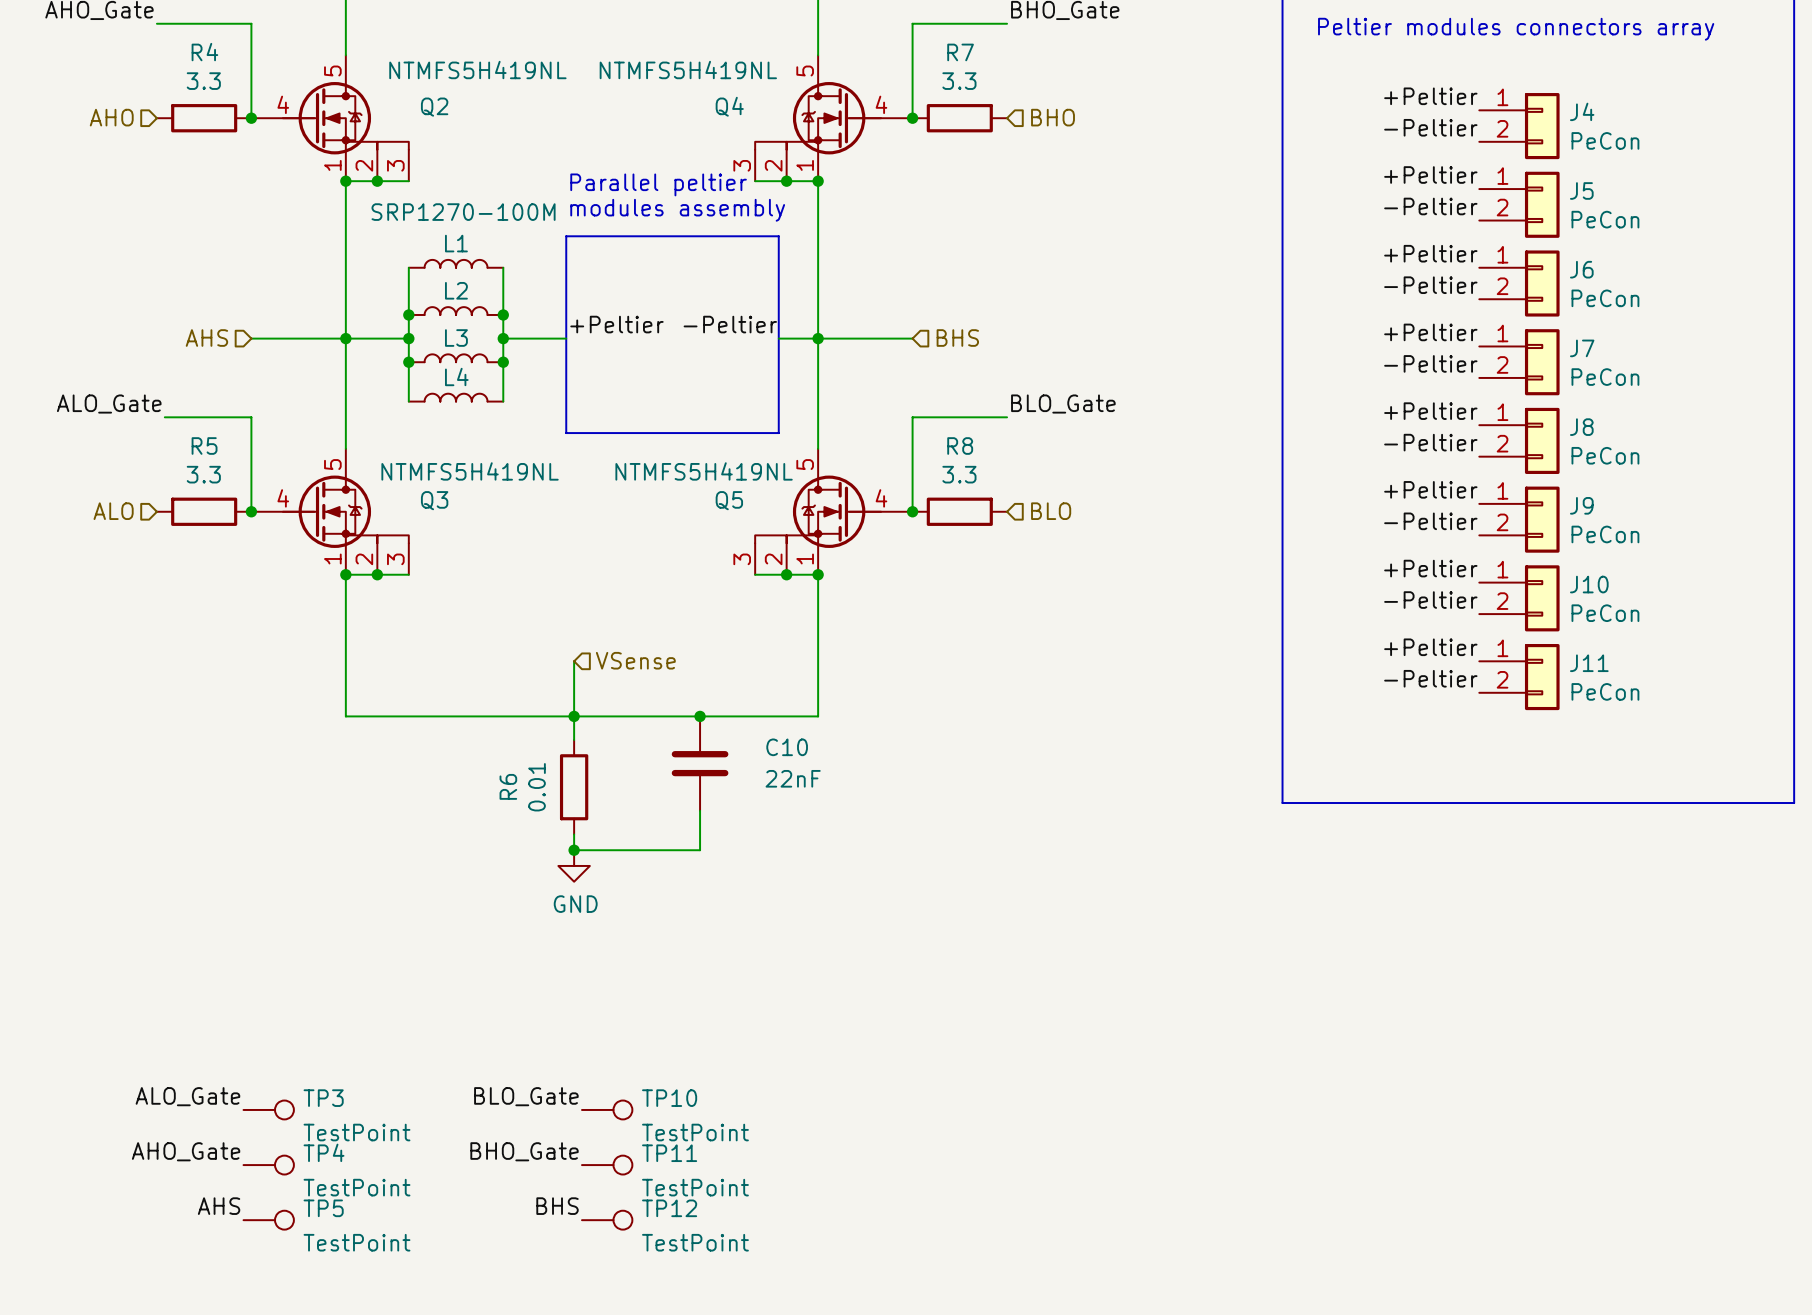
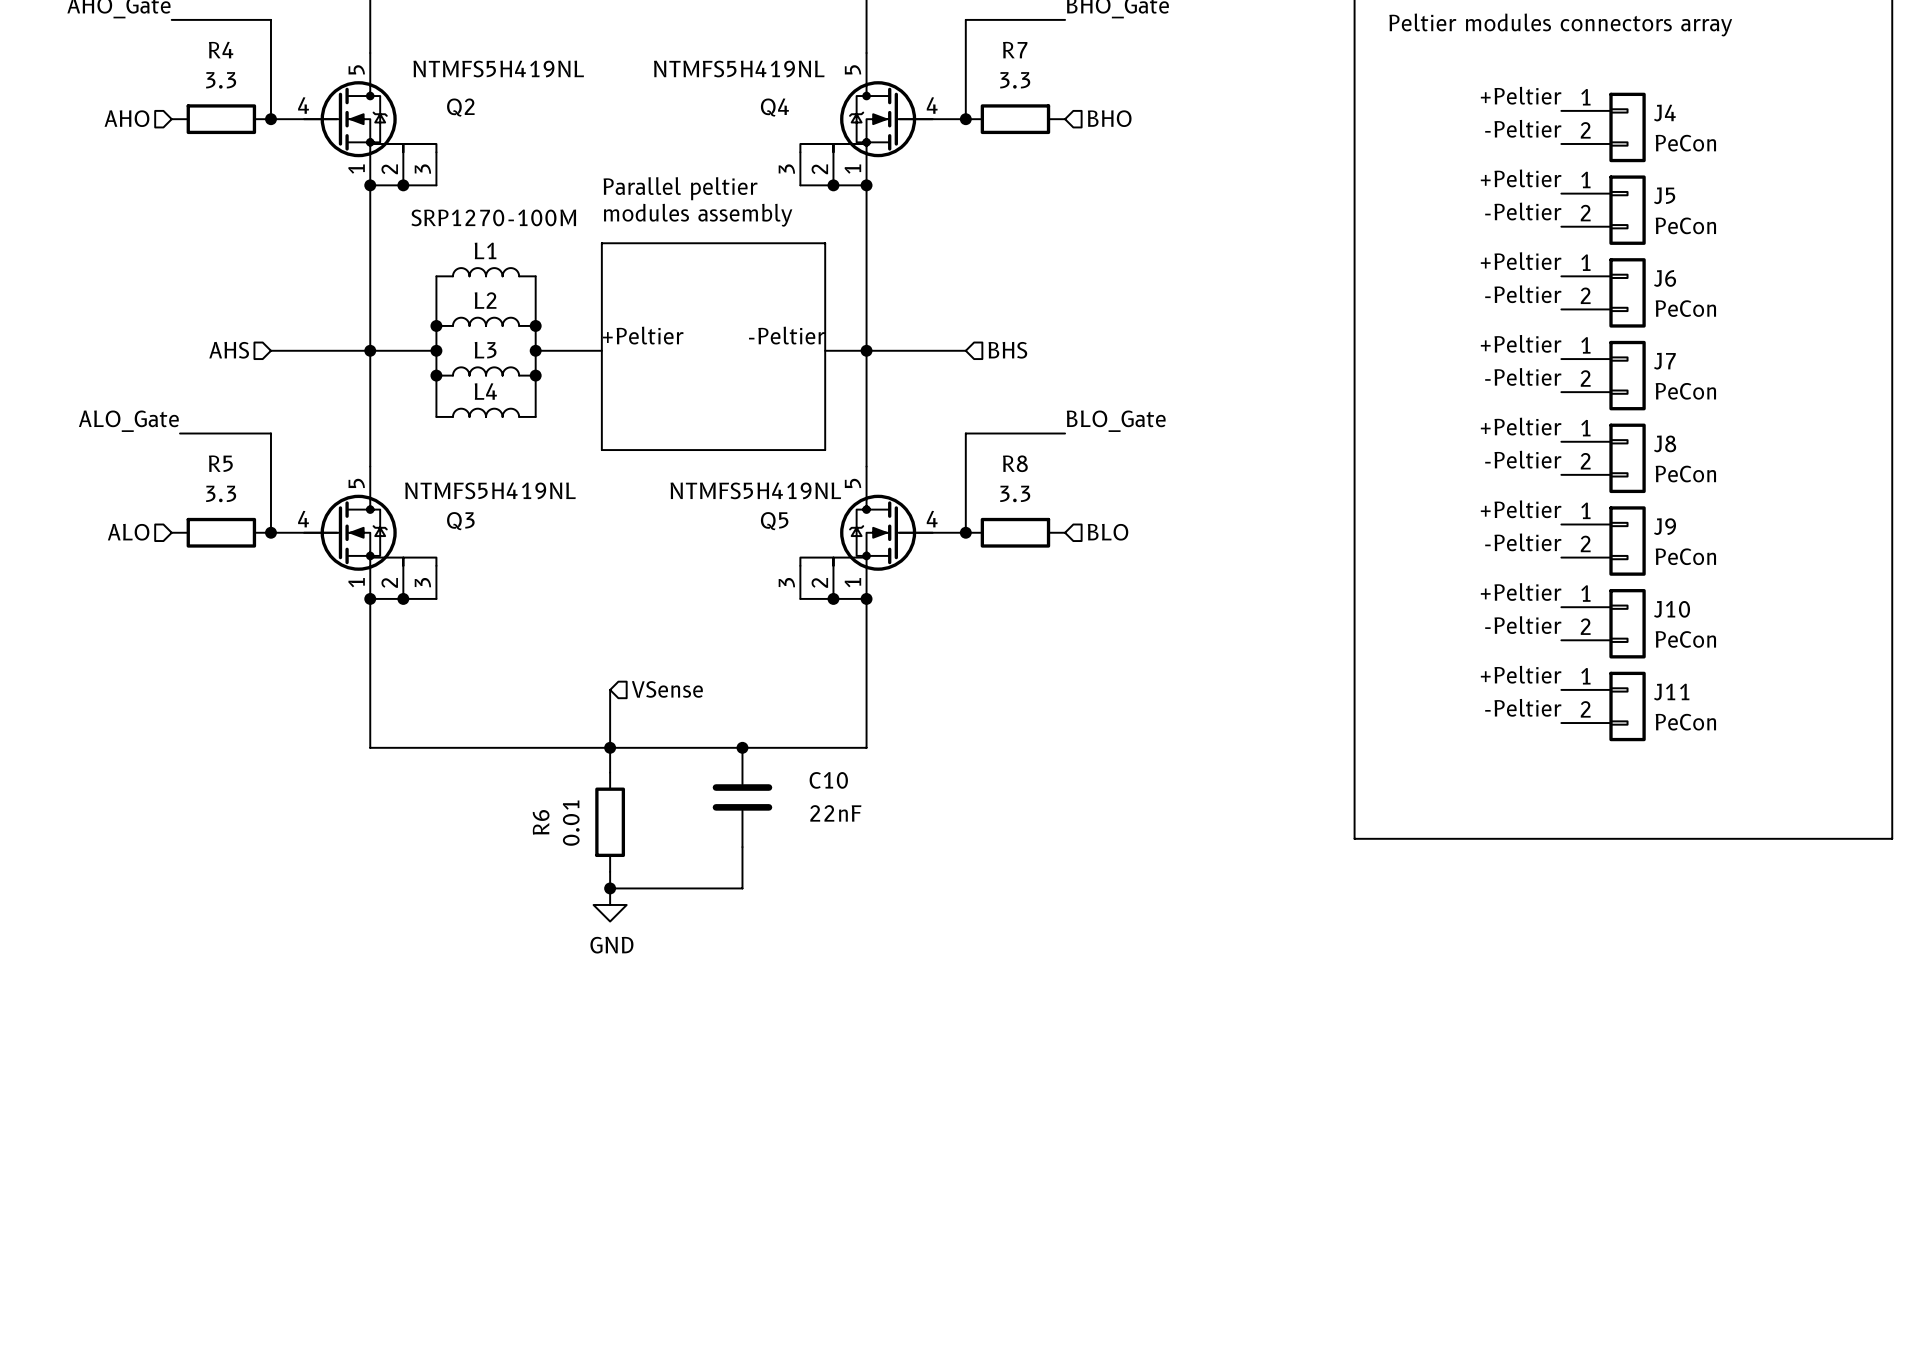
label: ALO_Gate (187, 1096) -> none
label: BLO_Gate (526, 1096) -> none
TP3: TestPoint (268, 1109) -> none
TP10: TestPoint (607, 1109) -> none
label: AHO_Gate (186, 1151) -> none
label: BHO_Gate (524, 1151) -> none
TP4: TestPoint (268, 1165) -> none
TP11: TestPoint (607, 1165) -> none
label: AHS (219, 1206) -> none
label: BHS (557, 1206) -> none
TP5: TestPoint (268, 1220) -> none
TP12: TestPoint (607, 1220) -> none

